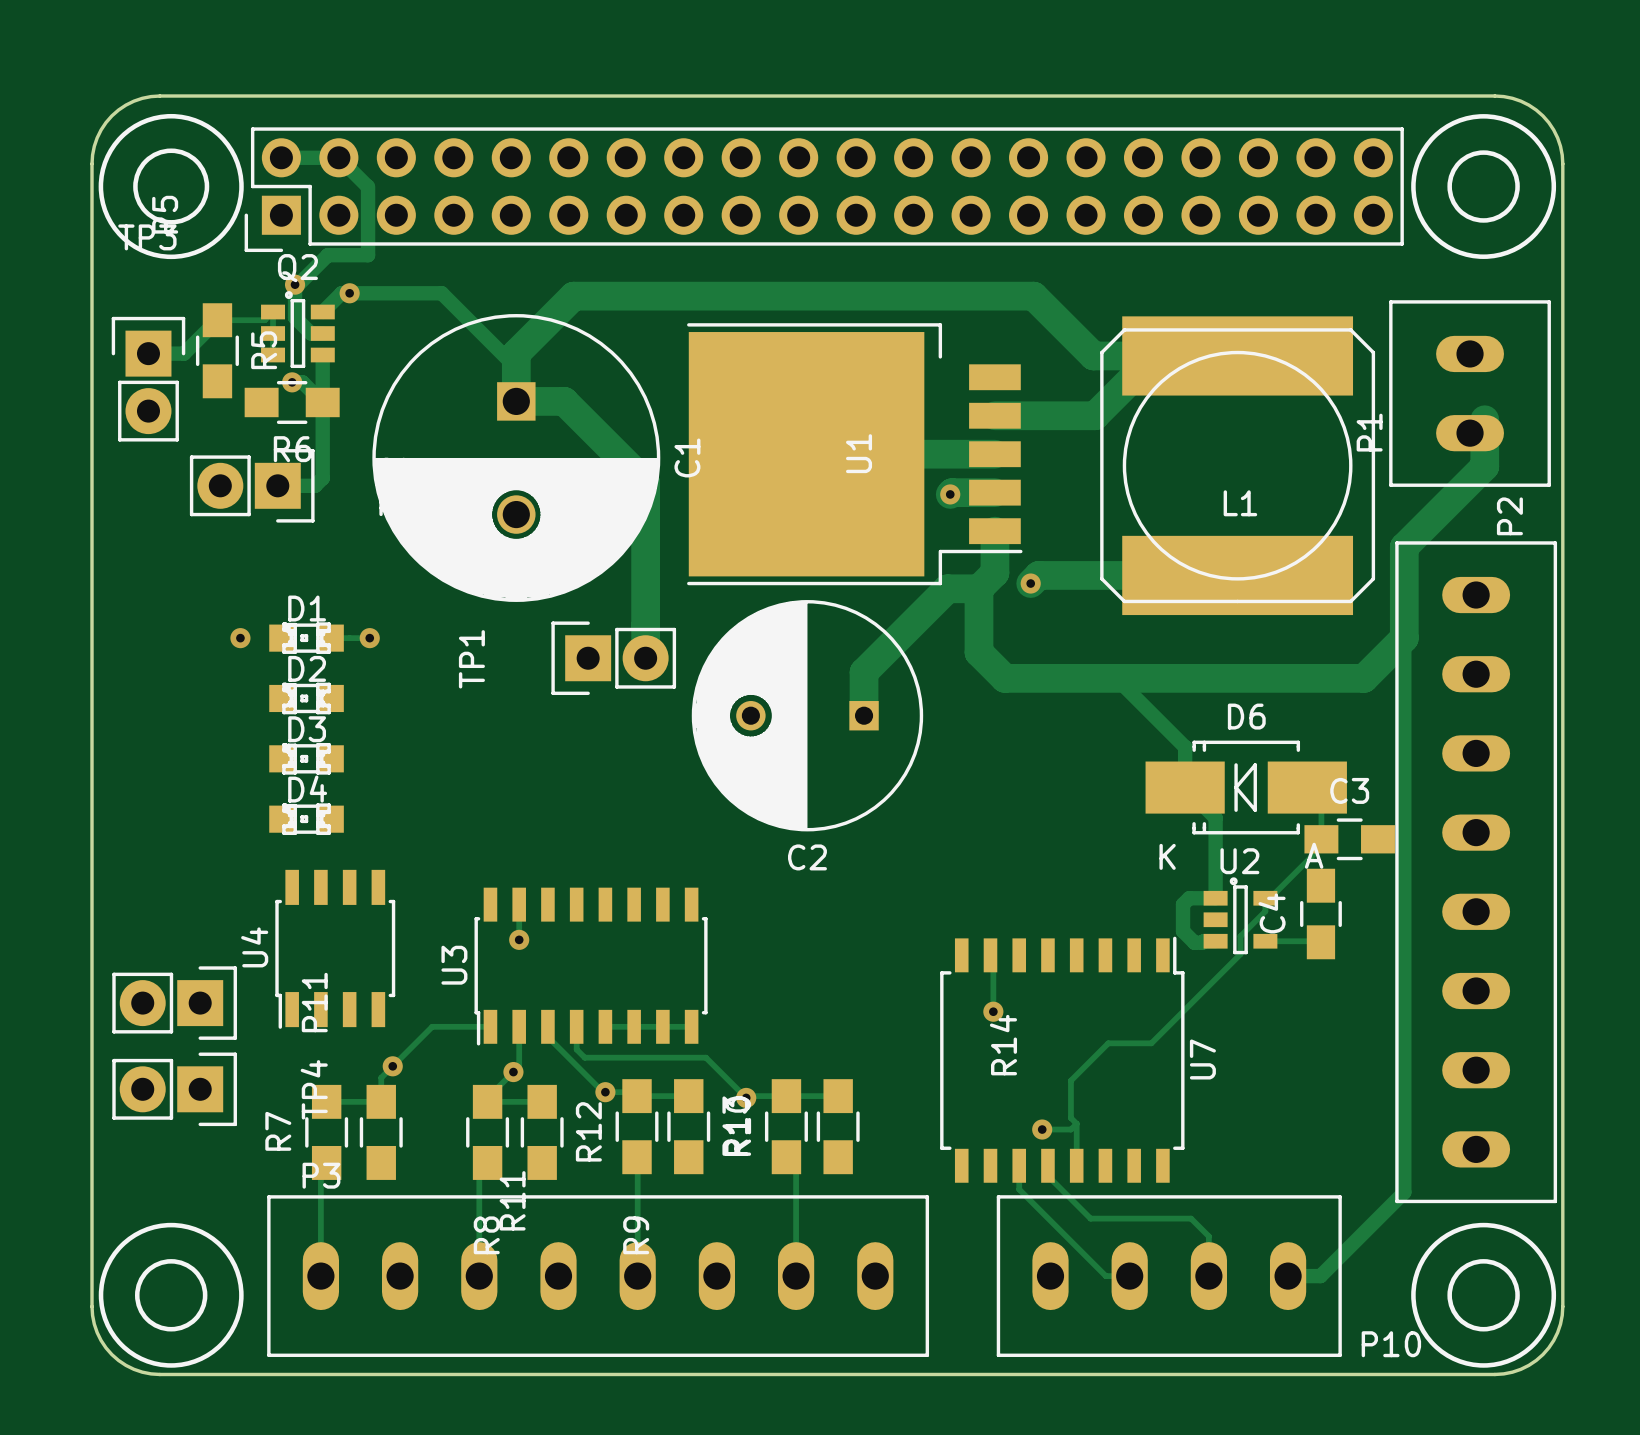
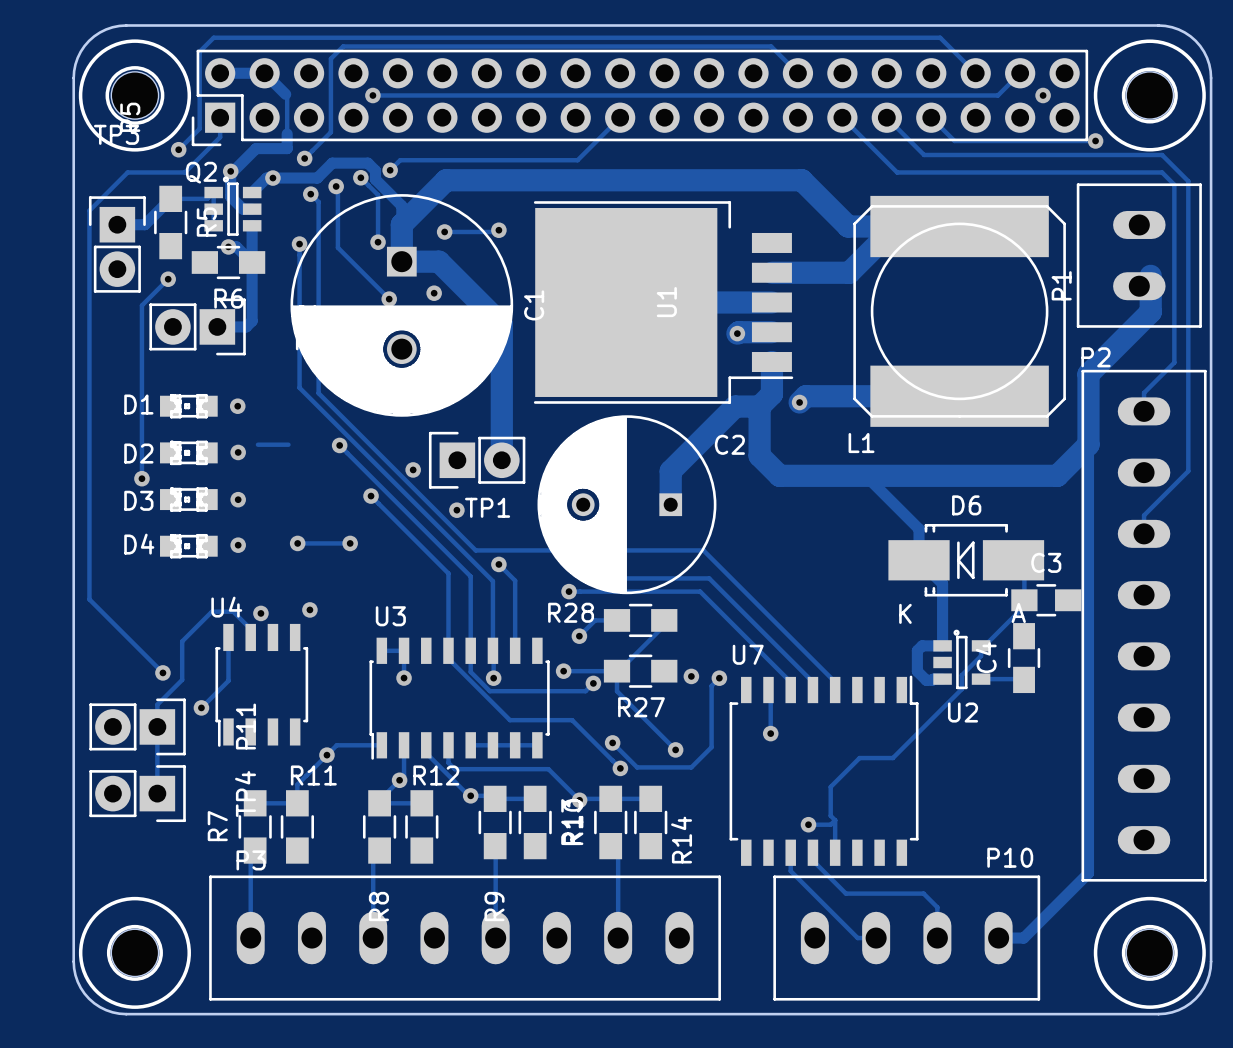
track: none -> (797, 73) (771, 46) (343, 46) (330, 58) (330, 132) (304, 158)
track: none -> (975, 73) (940, 37) (213, 37) (199, 51) (199, 128) (178, 149)
track: none -> (1020, 73) (997, 95) (372, 95)
part: none -> (134, 95)
track width: thick (368, 186) (368, 236) -> thin (287, 95) (287, 133)
via: none -> (372, 95)
via: none -> (1043, 95)
part: none -> (1149, 95)
track: none -> (220, 117) (220, 137) (184, 172) (127, 172) (89, 210) (89, 599) (162, 672)
track: none -> (620, 117) (577, 160) (400, 160) (390, 170)
track: none -> (842, 117) (897, 172) (1162, 172) (1174, 184) (1174, 362) (1144, 392) (1144, 411)
track: none -> (886, 117) (924, 154) (1162, 154) (1188, 181) (1188, 471) (1144, 515) (1144, 533)
track: none -> (931, 117) (954, 140) (1095, 140)
via: none -> (1095, 140)
via: none -> (178, 149)
via: none -> (304, 158)
Q2 name position: Q2 (297, 268) -> Q2 (201, 172)
via: none -> (390, 170)
track: none -> (360, 177) (378, 194) (378, 242)
via: none -> (360, 177)
track: (407, 293) (441, 293) (516, 367) -> (317, 178) (332, 163) (367, 163) (375, 170) (375, 179) (401, 205) (401, 235)
track: none -> (336, 186) (337, 188) (337, 247) (388, 298)
via: none -> (336, 186)
track: none -> (310, 194) (318, 202) (318, 393) (475, 550) (703, 550) (835, 682) (835, 690)
via: none -> (310, 194)
track: none -> (498, 230) (497, 231) (444, 231)
via: none -> (498, 230)
via: none -> (444, 231)
via: none -> (378, 242)
track: none -> (299, 244) (299, 387) (492, 581) (493, 678)
via: none -> (299, 244)
track: none -> (168, 279) (141, 305) (141, 478)
via: none -> (168, 279)
via: none -> (434, 293)
via: none -> (389, 299)
L1 name position: L1 (1240, 503) -> L1 (861, 443)
P2 name rotation: 0° (1509, 516) -> 90° clockwise (1095, 357)
P2 name position: P2 (1509, 516) -> P2 (1095, 357)
via: none -> (237, 406)
D1 name position: D1 (307, 608) -> D1 (138, 404)
via: (240, 638) -> none
D1 position: (306, 638) -> (188, 406)
via: (369, 638) -> none
track: none -> (339, 445) (470, 576) (470, 671) (489, 691) (585, 691) (593, 683)
via: none -> (339, 445)
via: none -> (238, 452)
TP1 name rotation: 0° (471, 659) -> 90° clockwise (487, 507)
TP1 name position: TP1 (471, 659) -> TP1 (487, 507)
D2 name position: D2 (307, 668) -> D2 (138, 453)
via: none -> (413, 469)
via: none -> (141, 478)
D2 position: (306, 698) -> (188, 452)
track: none -> (371, 496) (448, 573) (448, 658) (509, 720) (572, 720) (620, 768)
via: none -> (371, 496)
via: none -> (238, 499)
via: none -> (456, 510)
D3 name position: D3 (307, 729) -> D3 (138, 500)
D3 position: (306, 758) -> (188, 499)
track: none -> (297, 543) (350, 543)
via: none -> (297, 543)
via: none -> (350, 543)
via: none -> (238, 545)
D4 name position: D4 (307, 789) -> D4 (139, 544)
track: none -> (498, 564) (515, 580) (515, 650)
via: none -> (498, 564)
track: none -> (589, 578) (709, 578) (812, 682) (812, 690)
D4 position: (306, 819) -> (188, 546)
track: none -> (569, 591) (700, 591) (790, 682) (790, 690)
via: none -> (569, 591)
via: none -> (309, 609)
via: none -> (260, 613)
C2 name position: C2 (807, 857) -> C2 (729, 444)
U2 name position: U2 (1239, 861) -> U2 (963, 712)
track: none -> (617, 620) (595, 620) (579, 636)
R28: none -> (640, 620)
track: none -> (664, 620) (664, 625) (618, 671) (563, 671)
via: none -> (579, 636)
track: none -> (228, 637) (228, 680) (201, 707)
track: none -> (250, 637) (250, 629) (233, 611) (211, 611) (182, 641) (182, 679) (157, 704) (157, 793)
track: none -> (381, 650) (404, 650)
via: none -> (563, 671)
track: none -> (617, 671) (617, 691) (675, 749)
R27: none -> (640, 671)
via: none -> (162, 672)
via: none -> (691, 676)
via: none -> (493, 678)
track: none -> (719, 678) (711, 685) (711, 747) (691, 767) (637, 767) (612, 742)
via: none -> (719, 678)
via: none -> (593, 683)
U4 name rotation: 0° (254, 947) -> 90° clockwise (226, 607)
U4 name position: U4 (254, 947) -> U4 (226, 607)
U3 name rotation: 0° (454, 965) -> 90° clockwise (390, 616)
U3 name position: U3 (454, 965) -> U3 (390, 616)
via: none -> (201, 707)
via: none -> (612, 742)
via: none -> (675, 749)
R14 name position: R14 (1003, 1045) -> R14 (681, 840)
via: none -> (620, 768)
U7 name rotation: 0° (1202, 1059) -> 90° clockwise (748, 654)
U7 name position: U7 (1202, 1059) -> U7 (748, 654)
via position: (392, 1066) -> (326, 755)
R12 name rotation: 0° (588, 1131) -> 90° clockwise (436, 775)
R11 name rotation: 0° (512, 1200) -> 90° clockwise (313, 775)
R11 name position: R11 (512, 1200) -> R11 (313, 775)
part: none -> (134, 952)
part: none -> (1149, 952)
P10 name position: P10 (1391, 1344) -> P10 (1010, 857)

